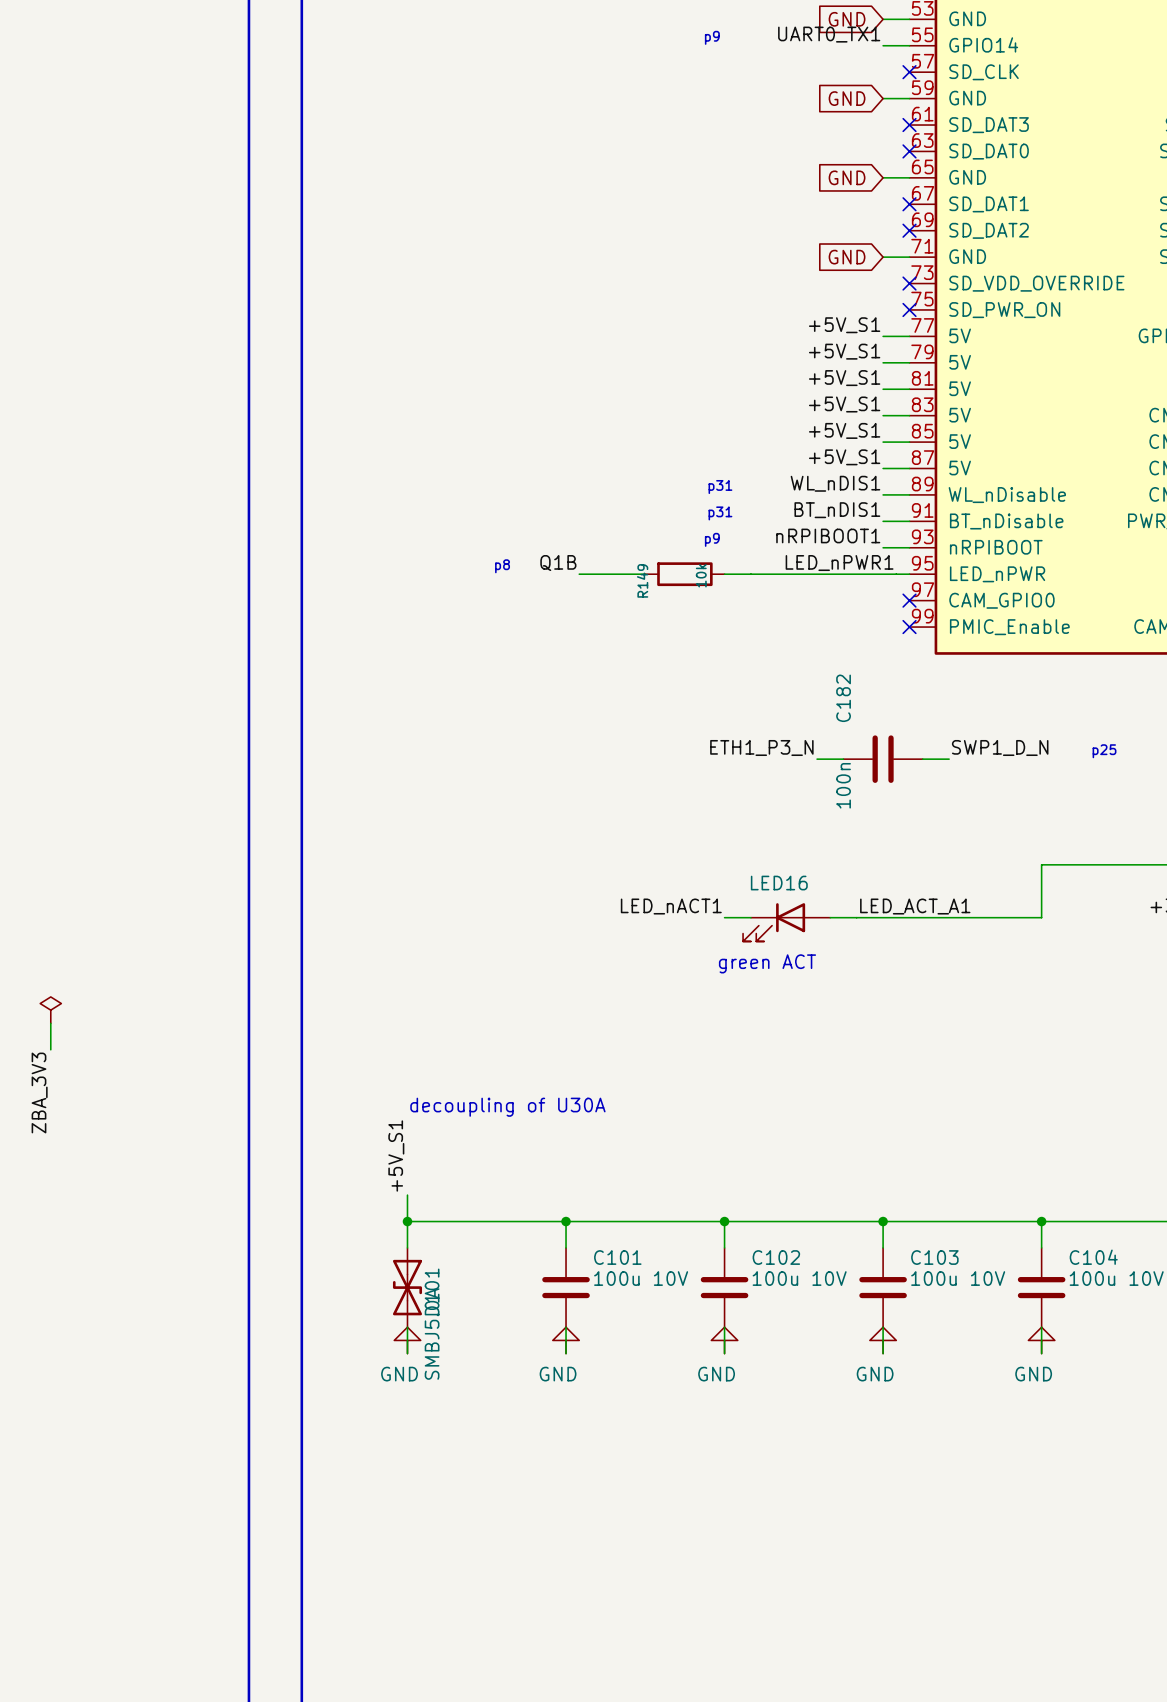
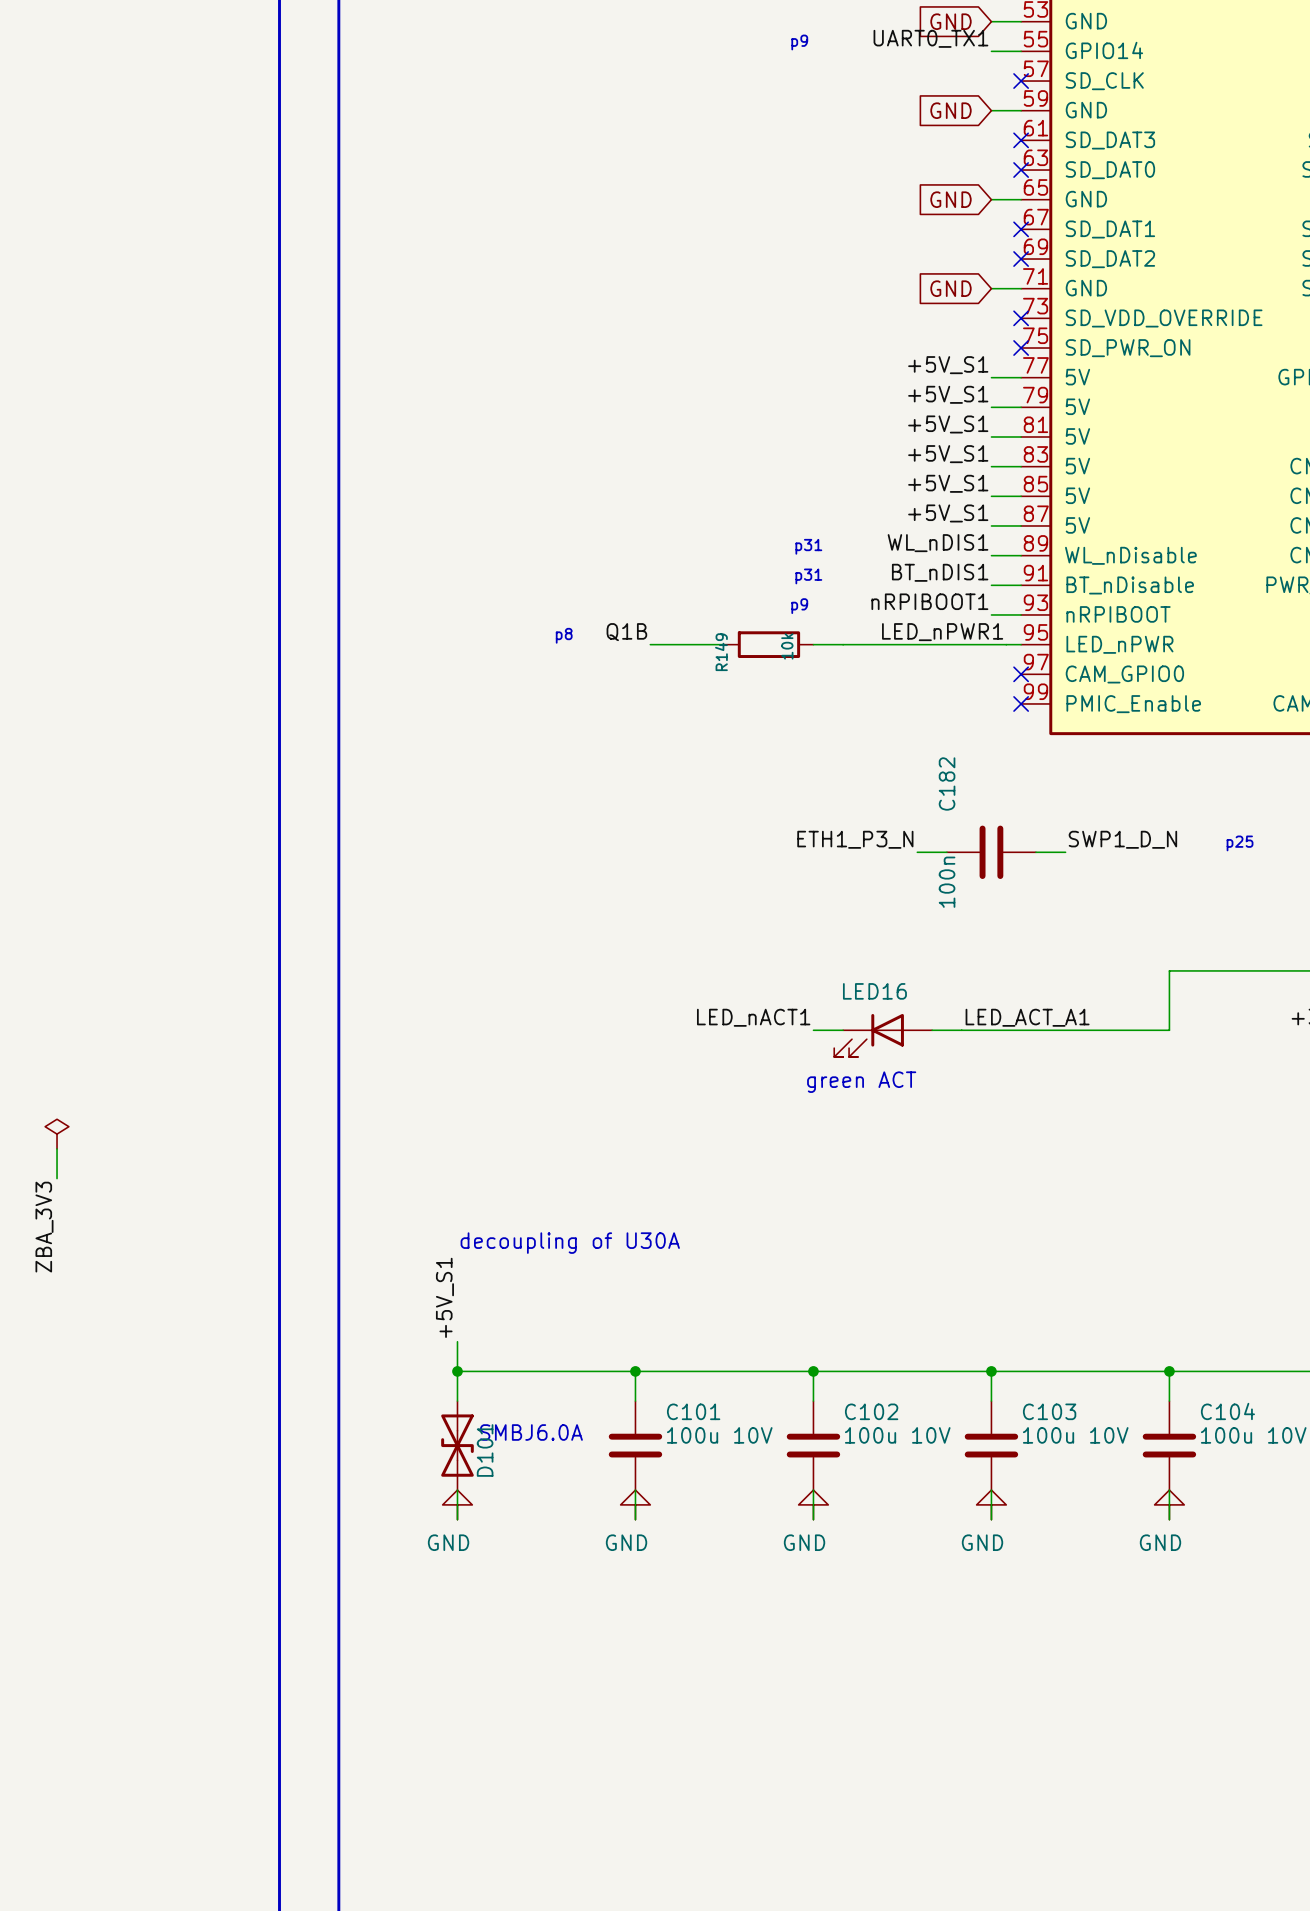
text: none -> SMBJ6.0A (531, 1432)
D101 value: SMBJ5.0A (432, 1334) -> none

